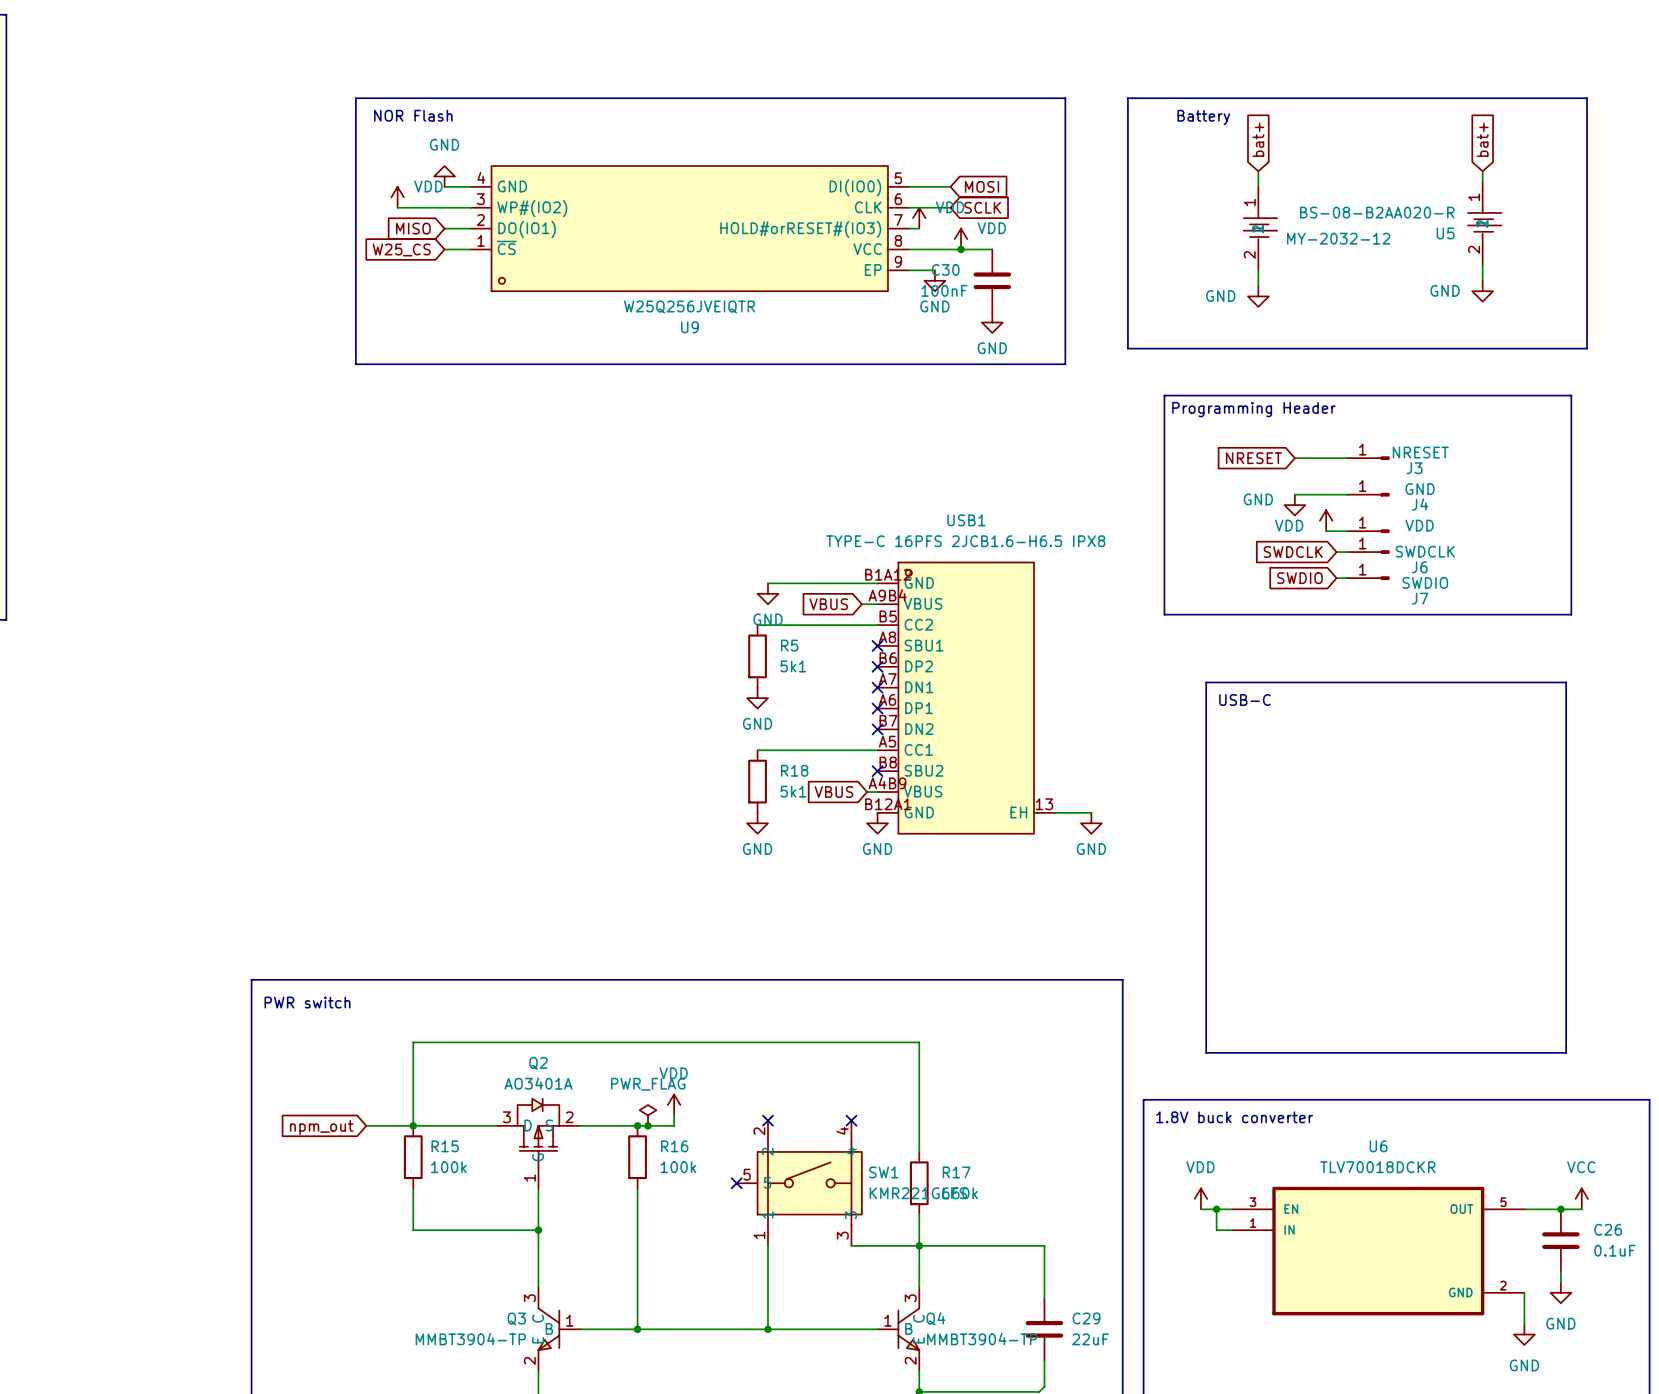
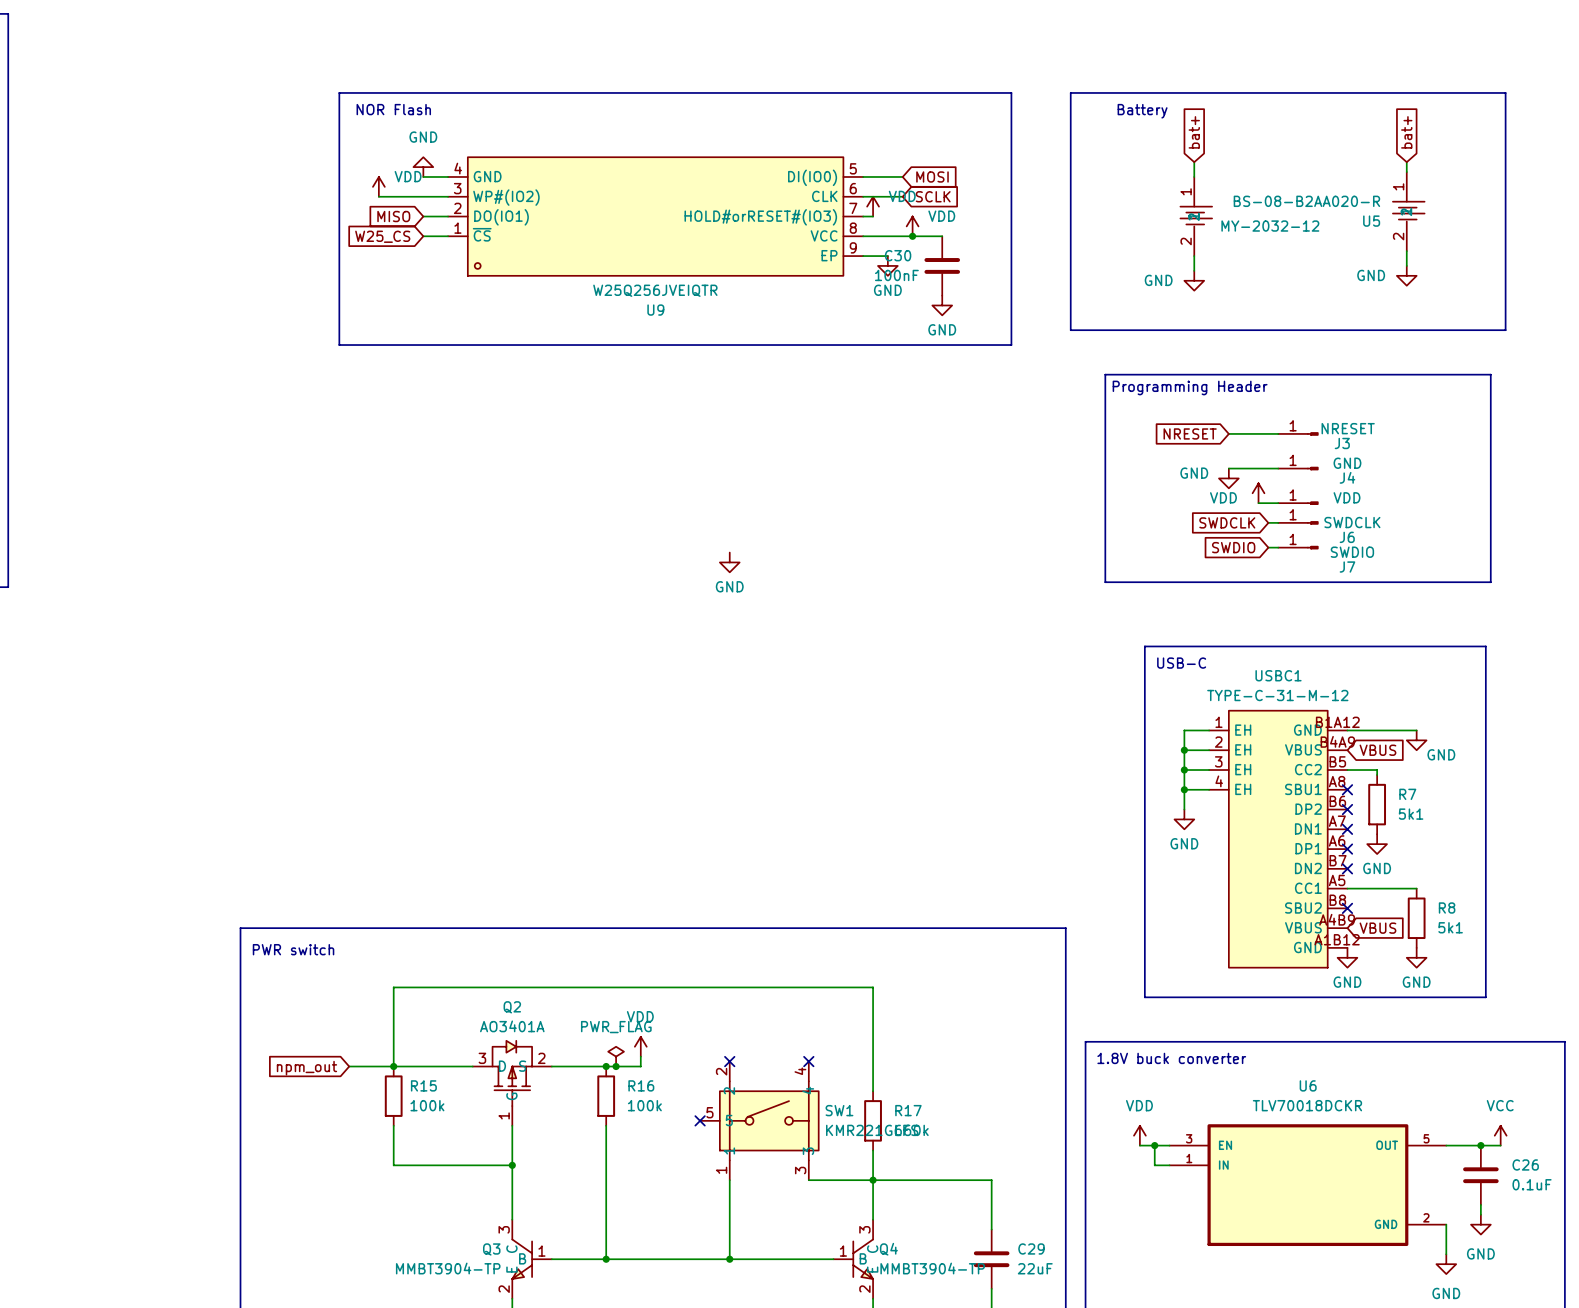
wire: (767, 583) (877, 583) -> none
global label: VBUS (828, 604) -> none
wire: (861, 604) (877, 604) -> none
wire: (757, 625) (877, 625) -> none
no-connect mark: (877, 645) -> none
R5: 5k1 (757, 656) -> none
no-connect mark: (877, 666) -> none
no-connect mark: (877, 687) -> none
power symbol: GND (757, 698) -> none
USB1: TYPE-C 16PFS 2JCB1.6-H6.5 IPX8 (966, 698) -> none
no-connect mark: (877, 708) -> none
no-connect mark: (877, 729) -> none
wire: (757, 750) (877, 750) -> none
no-connect mark: (877, 771) -> none
wire: none -> (1209, 730) (1184, 730) (1184, 809)
wire: none -> (1347, 730) (1416, 730)
R18: 5k1 (757, 781) -> none
power symbol: none -> GND (1416, 740)
global label: VBUS (833, 792) -> none
wire: (867, 792) (877, 792) -> none
wire: none -> (1184, 750) (1209, 750)
junction: none -> (1184, 750)
global label: none -> VBUS (1377, 750)
wire: (1054, 812) (1091, 812) -> none
wire: none -> (1184, 770) (1209, 770)
junction: none -> (1184, 770)
wire: none -> (1347, 770) (1377, 770) (1377, 774)
power symbol: GND (757, 823) -> none
power symbol: GND (877, 823) -> none
power symbol position: GND (1091, 823) -> GND (1184, 819)
wire: none -> (1184, 789) (1209, 789)
junction: none -> (1184, 789)
no-connect mark: none -> (1347, 789)
R7: none -> 5k1 (1377, 804)
no-connect mark: none -> (1347, 809)
no-connect mark: none -> (1347, 829)
USBC1: none -> TYPE-C-31-M-12 (1278, 839)
power symbol: none -> GND (1377, 844)
no-connect mark: none -> (1347, 849)
no-connect mark: none -> (1347, 868)
wire: none -> (1347, 888) (1416, 888)
no-connect mark: none -> (1347, 908)
R8: none -> 5k1 (1416, 918)
global label: none -> VBUS (1377, 928)
power symbol: none -> GND (1347, 957)
power symbol: none -> GND (1416, 957)

